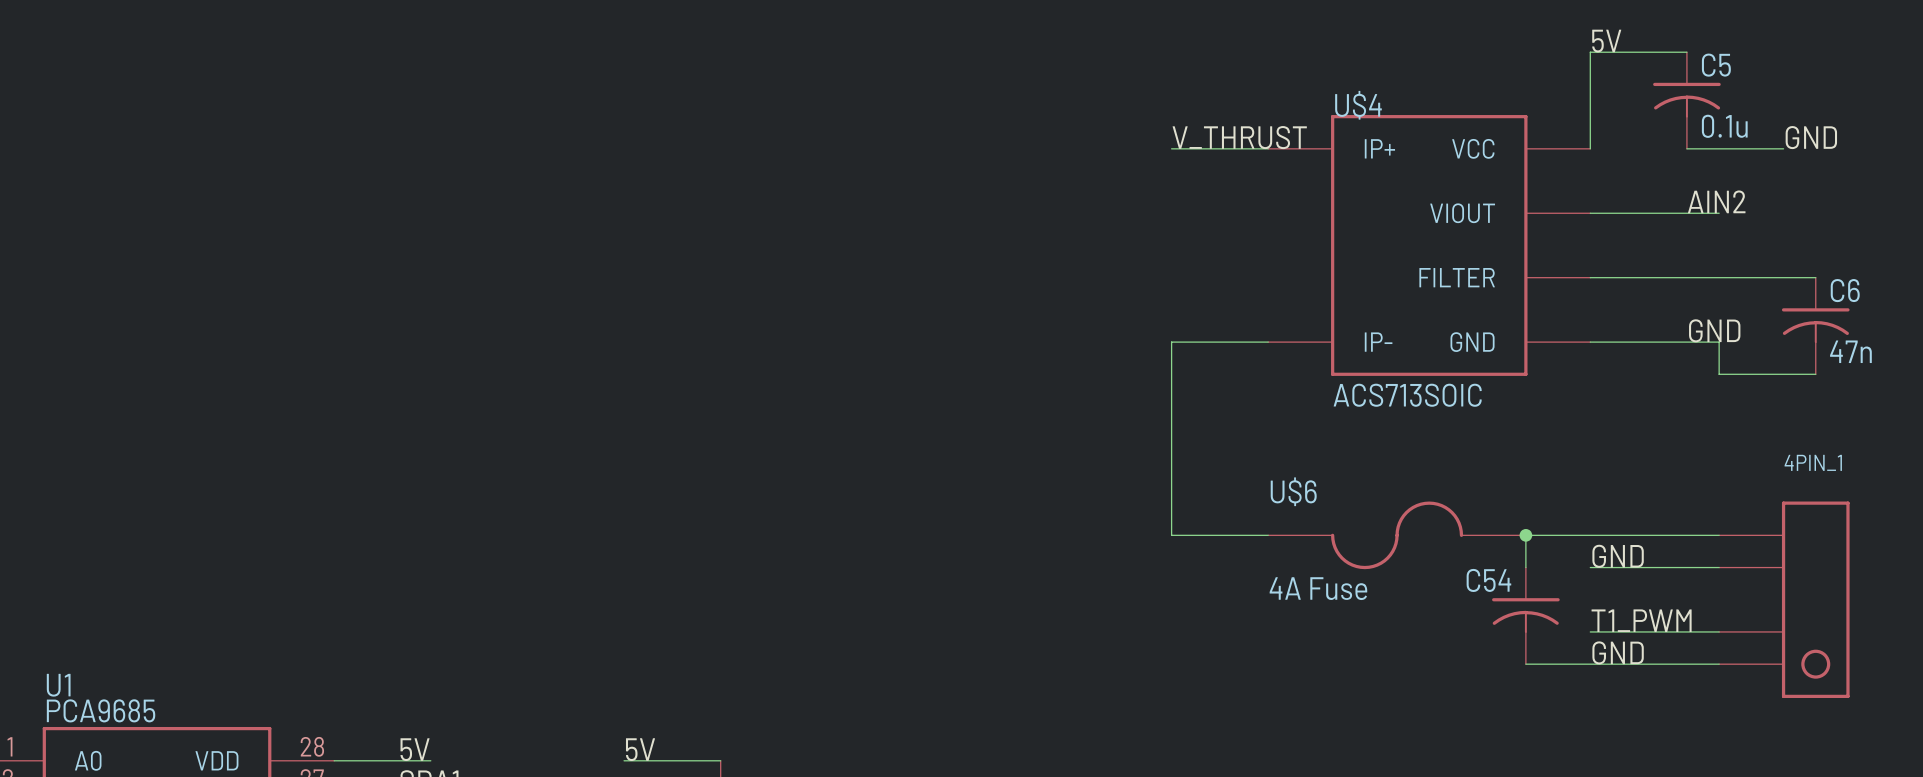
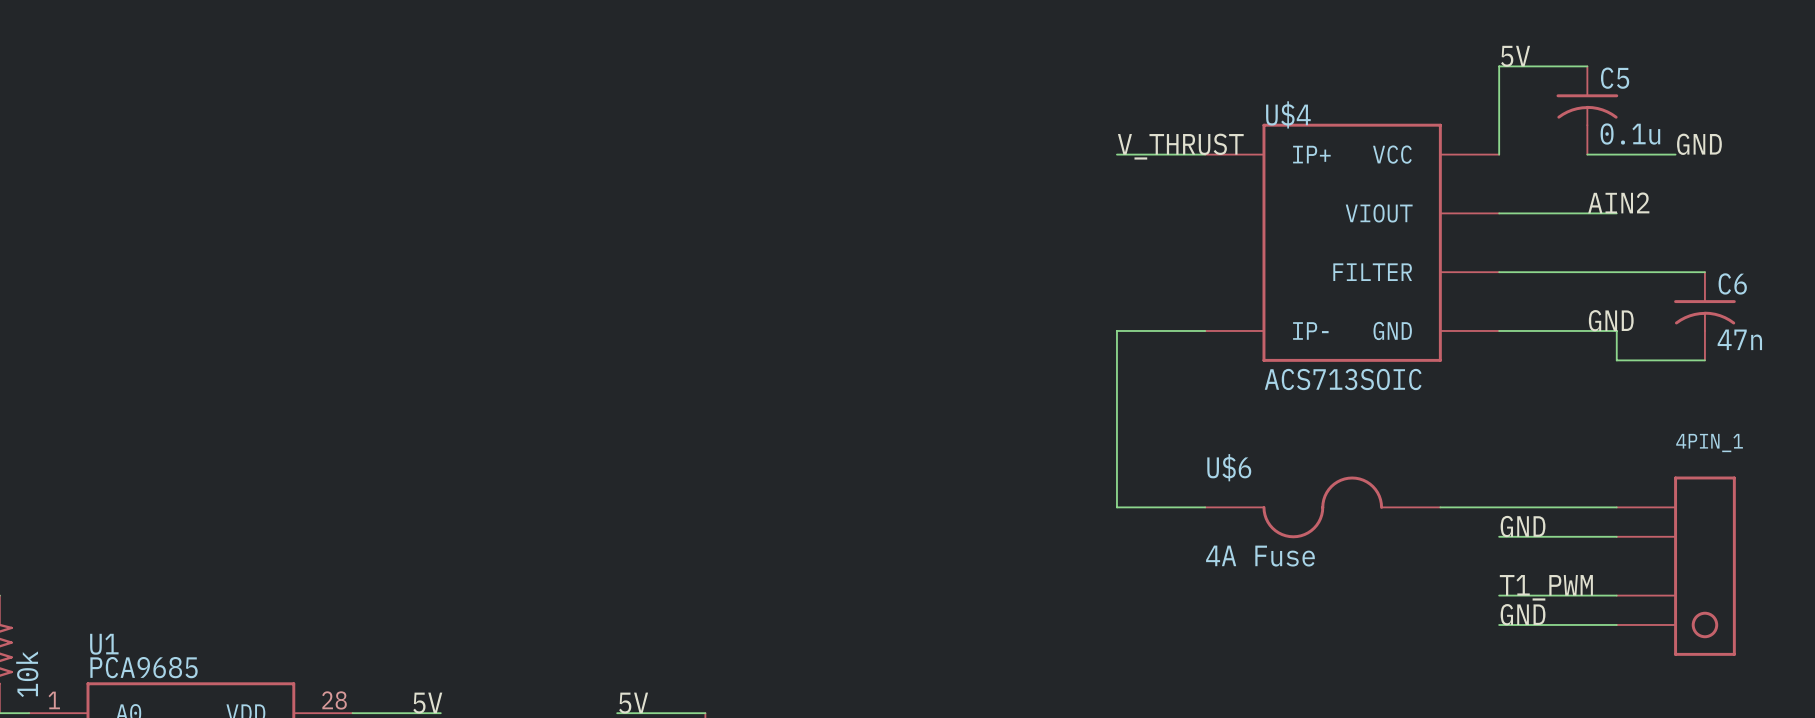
wire: (1525, 535) (1525, 567) -> none
junction: (1525, 535) -> none
C54: (1525, 615) -> none
wire: (1525, 664) (1590, 664) -> none

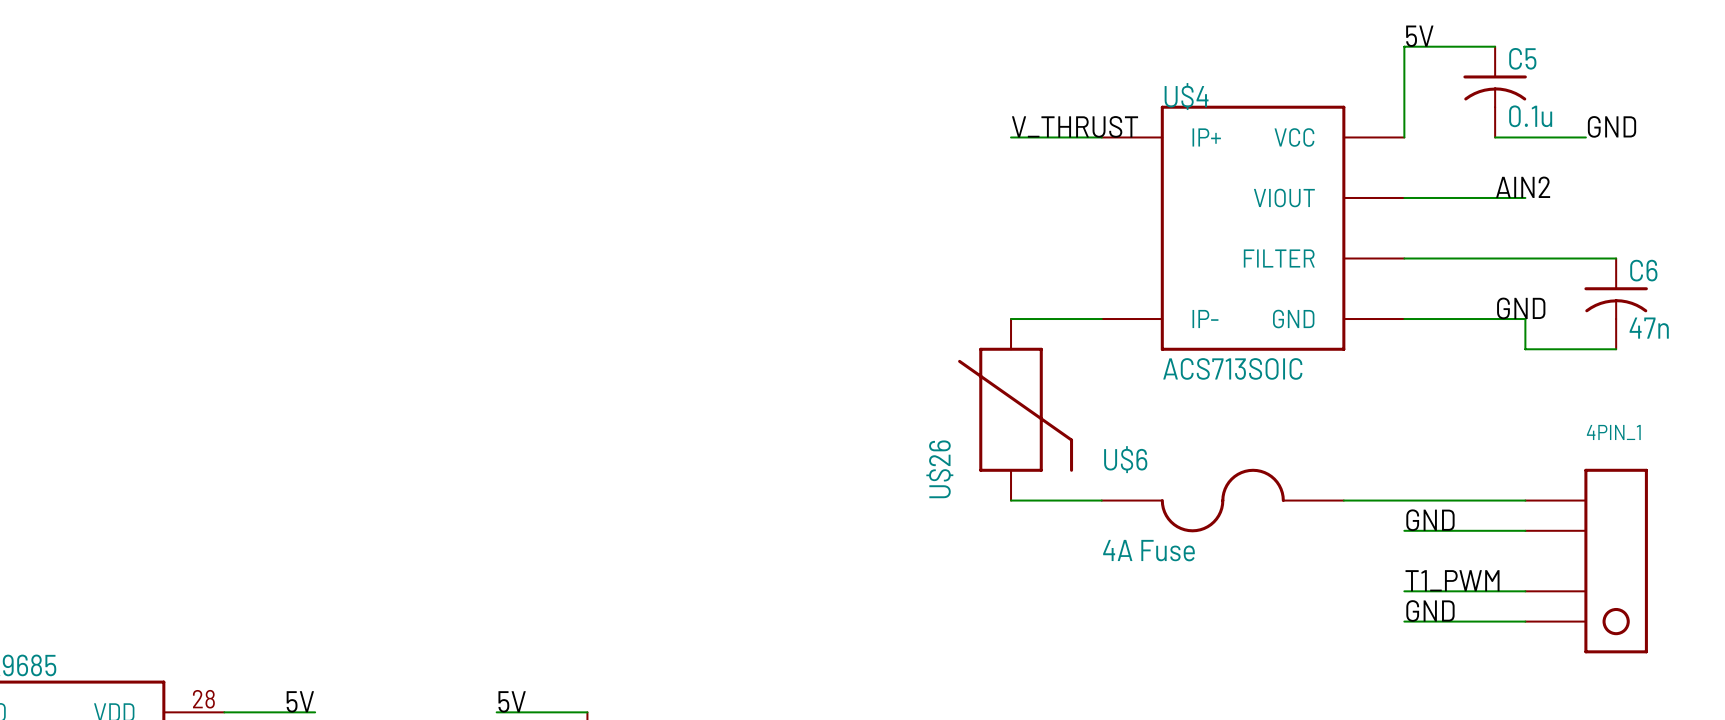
wire: (1116, 330) (1116, 507) -> none
U$26: none -> (1015, 409)

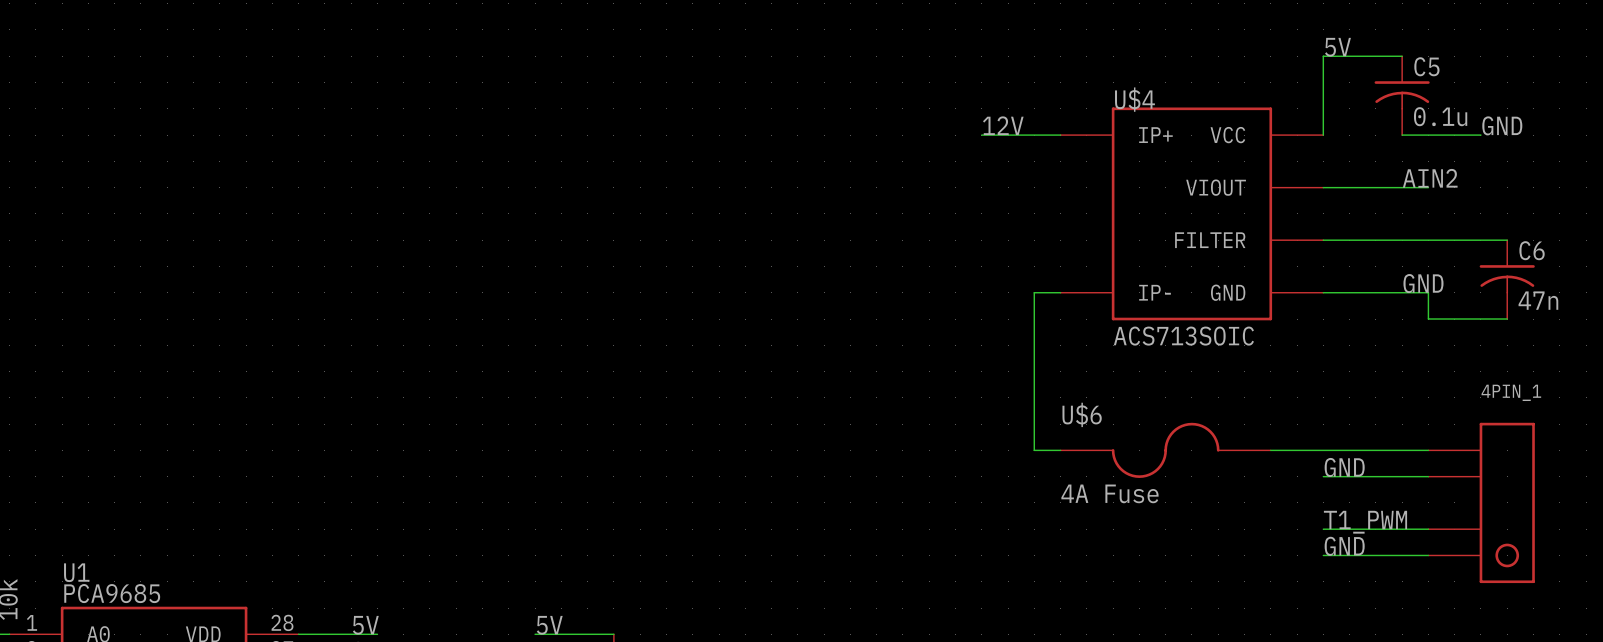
label: V_THRUST (1075, 126) -> 12V (1003, 125)
wire: (1011, 319) (1071, 319) -> (1034, 450) (1034, 292)
U$26: (1015, 409) -> none
wire: (1011, 500) (1071, 500) -> none

